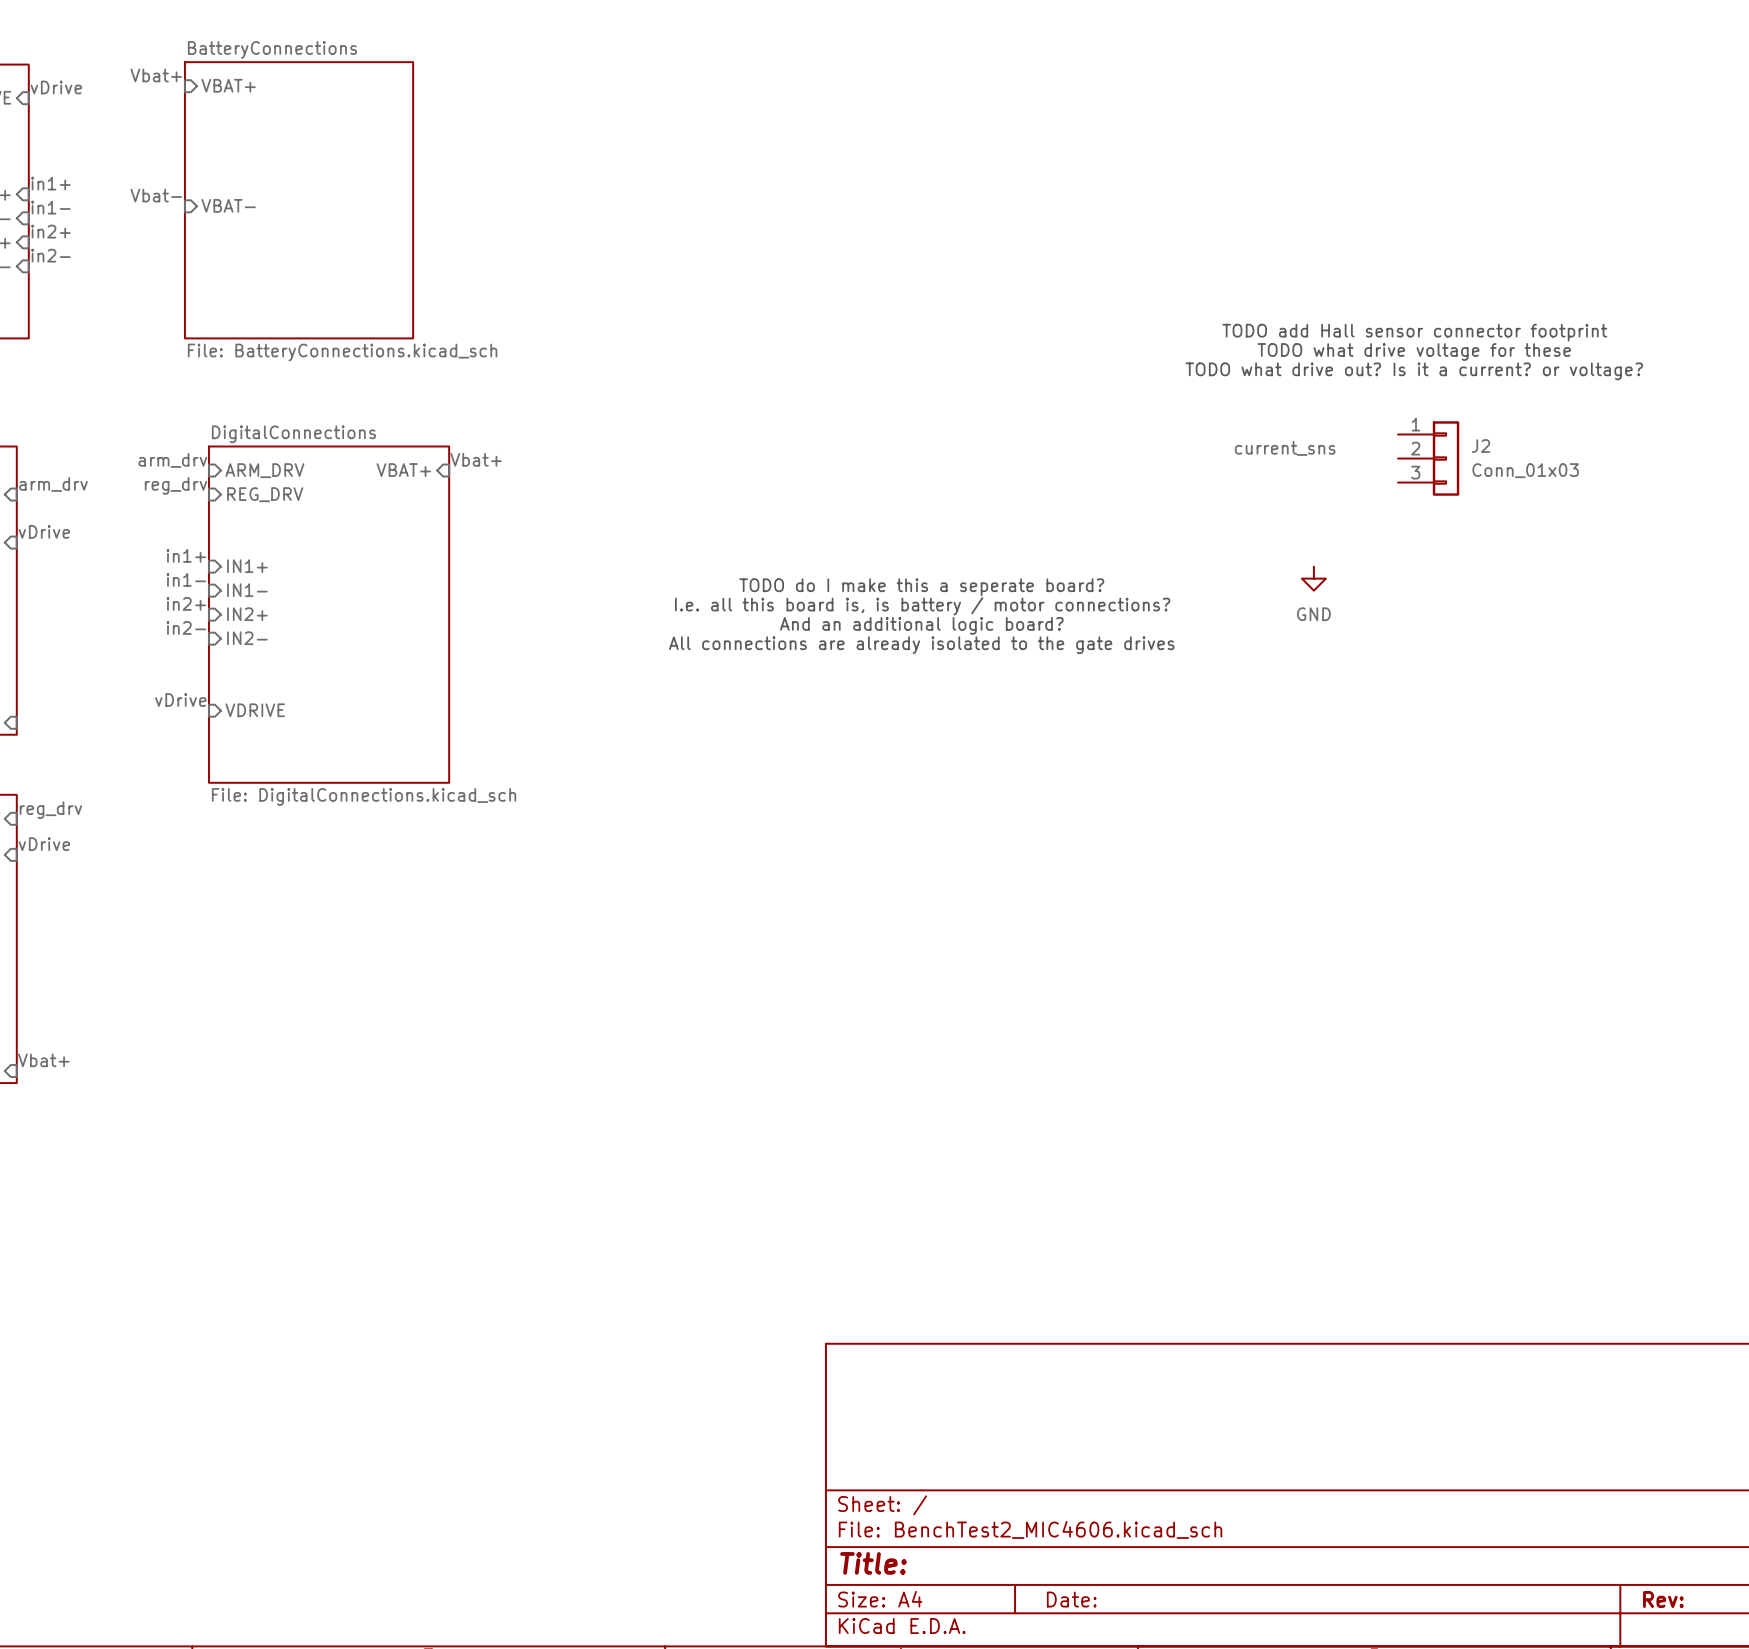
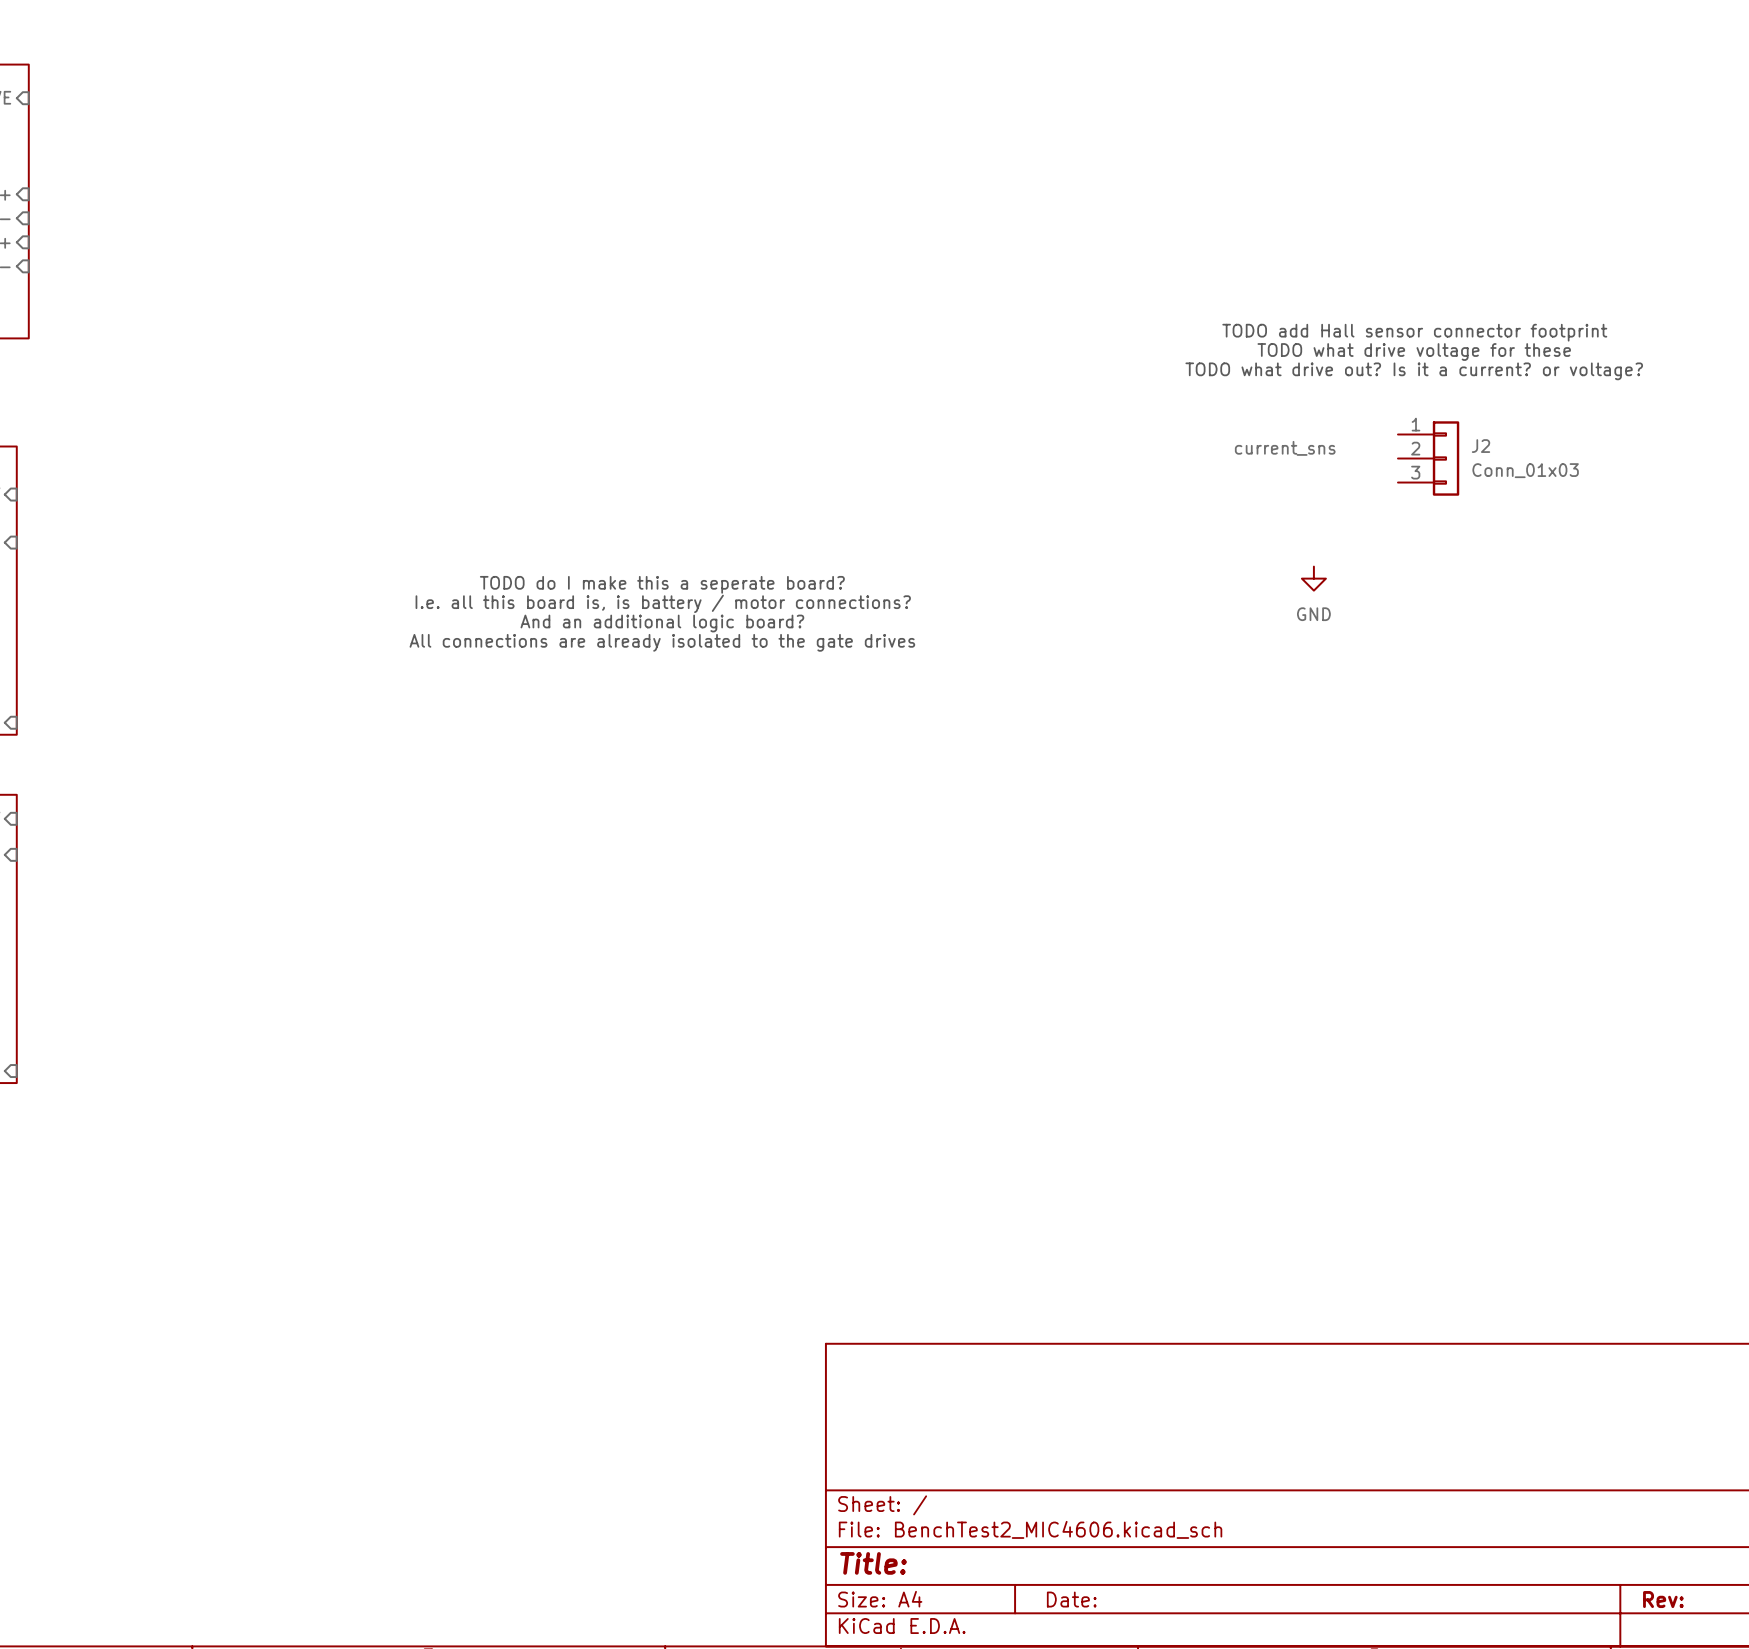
label: Vbat+ (156, 75) -> none
sheet pin: VBAT+ (228, 85) -> none
label: vDrive (56, 87) -> none
label: in1+ (50, 183) -> none
label: Vbat- (156, 195) -> none
sheet BatteryConnections: File: BatteryConnections.kicad_sch (299, 200) -> none
sheet pin: VBAT- (228, 205) -> none
label: in1- (50, 207) -> none
label: in2+ (50, 231) -> none
label: in2- (50, 255) -> none
label: Vbat+ (476, 459) -> none
label: arm_drv (172, 460) -> none
sheet pin: ARM_DRV (264, 470) -> none
sheet pin: VBAT+ (403, 470) -> none
label: arm_drv (53, 484) -> none
label: reg_drv (175, 485) -> none
sheet pin: REG_DRV (265, 494) -> none
label: vDrive (44, 531) -> none
label: in1+ (186, 555) -> none
sheet pin: IN1+ (247, 566) -> none
label: in1- (186, 579) -> none
text: none -> TODO do I make this a seperate board? (662, 584)
text: TODO do I make this a seperate board? (921, 587) -> none
sheet pin: IN1- (247, 590) -> none
label: in2+ (186, 603) -> none
text: none -> I.e. all this board is, is battery / motor connections? (663, 603)
text: I.e. all this board is, is battery / motor connections? (922, 606) -> none
sheet pin: IN2+ (247, 614) -> none
sheet DigitalConnections: File: DigitalConnections.kicad_sch (329, 614) -> none
text: none -> And an additional logic board? (662, 623)
text: And an additional logic board? (921, 625) -> none
label: in2- (186, 627) -> none
sheet pin: IN2- (247, 638) -> none
text: none -> All connections are already isolated to the gate drives (662, 642)
text: All connections are already isolated to the gate drives (921, 645) -> none
label: vDrive (180, 700) -> none
sheet pin: VDRIVE (255, 710) -> none
label: reg_drv (50, 810) -> none
label: vDrive (44, 844) -> none
label: Vbat+ (43, 1060) -> none

